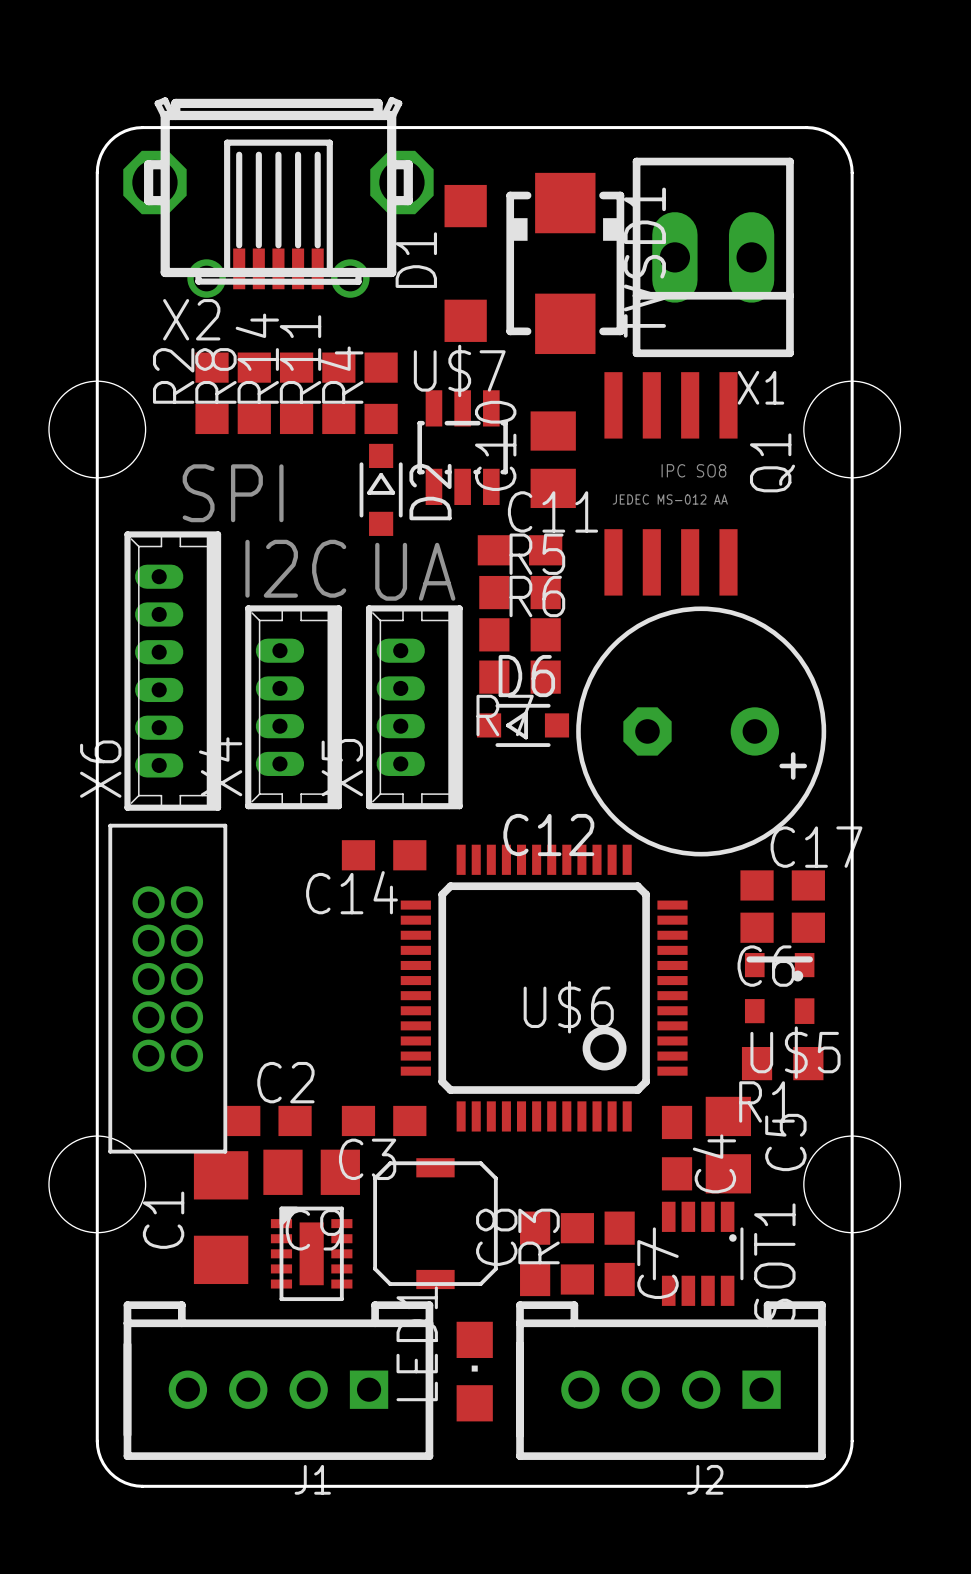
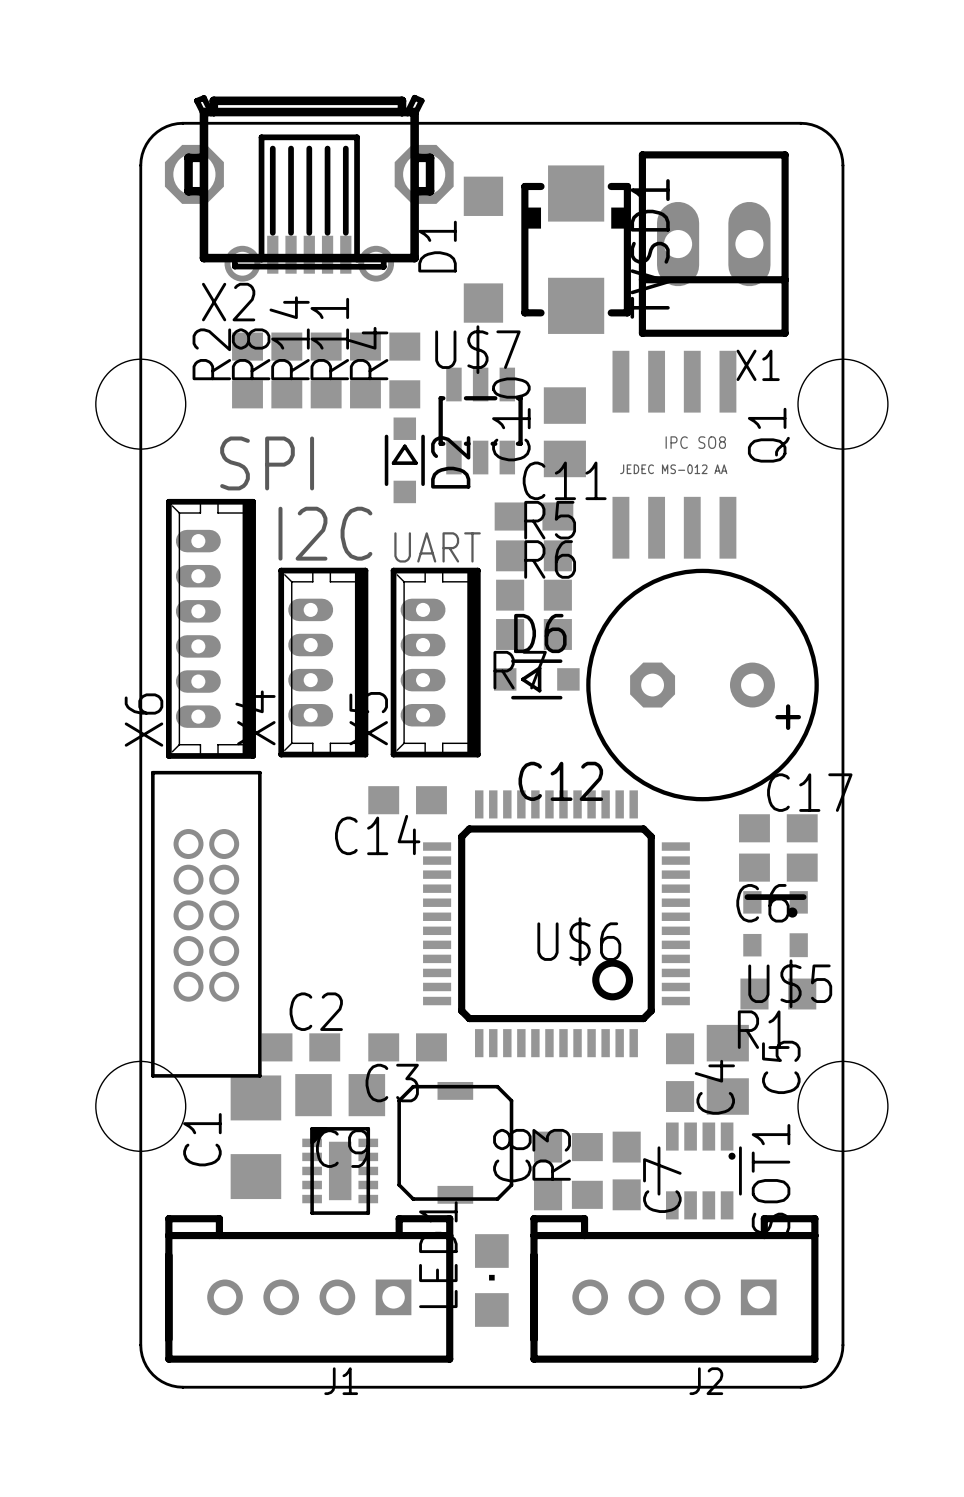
text: UA (415, 571) -> UART (437, 547)

